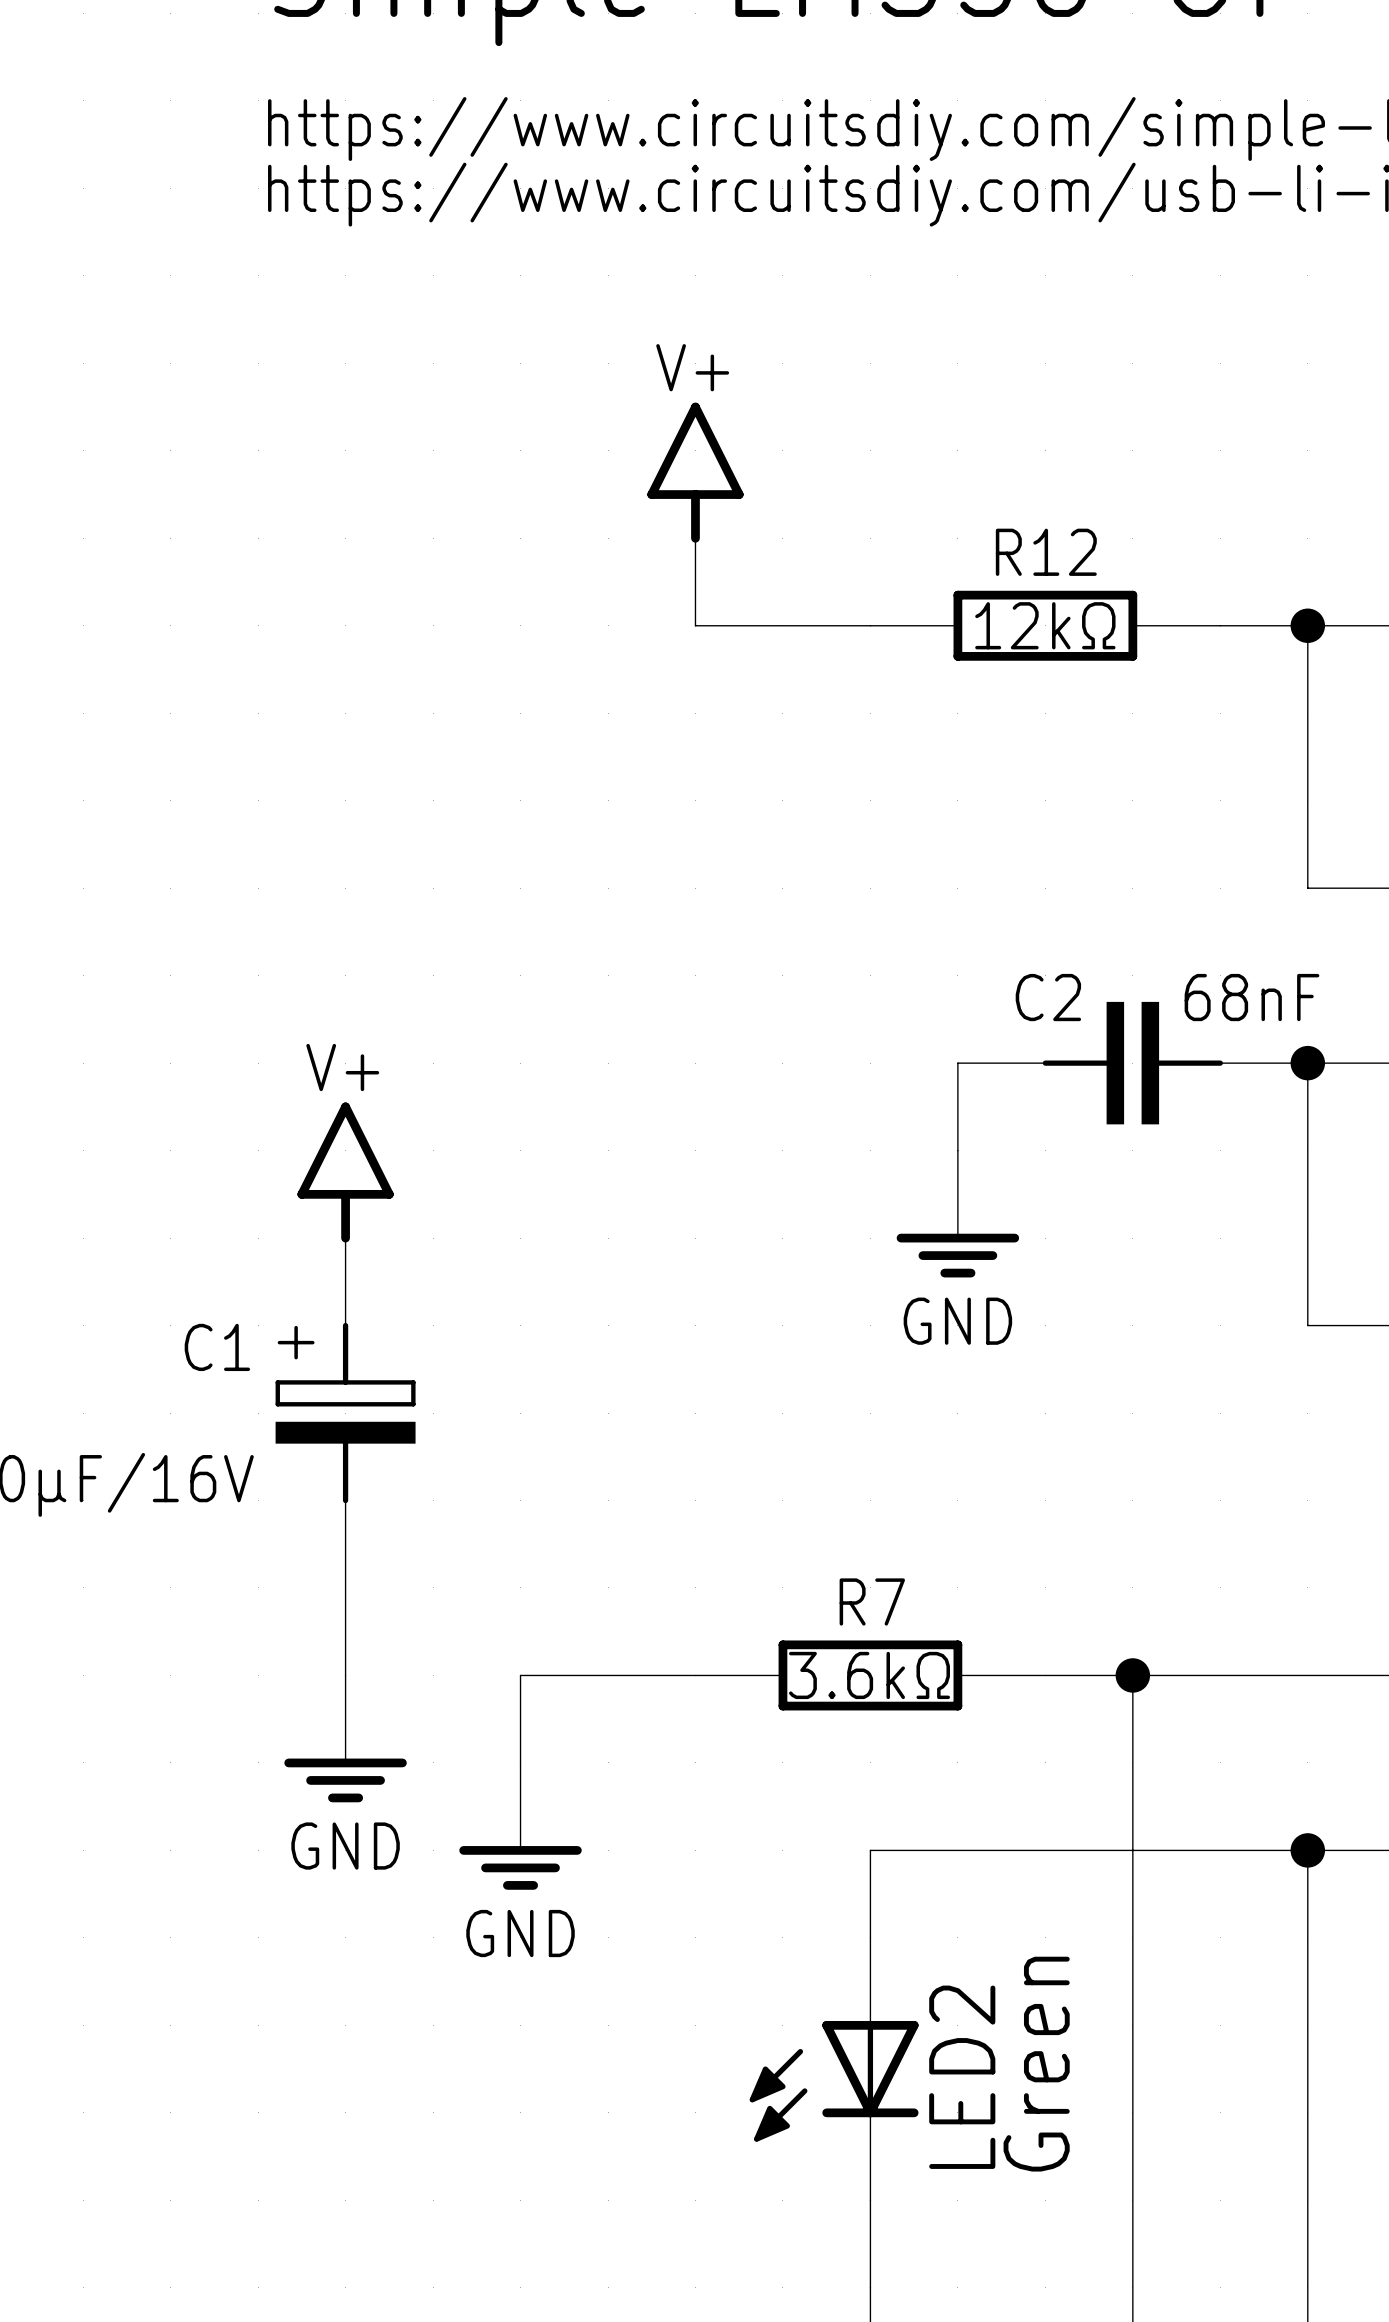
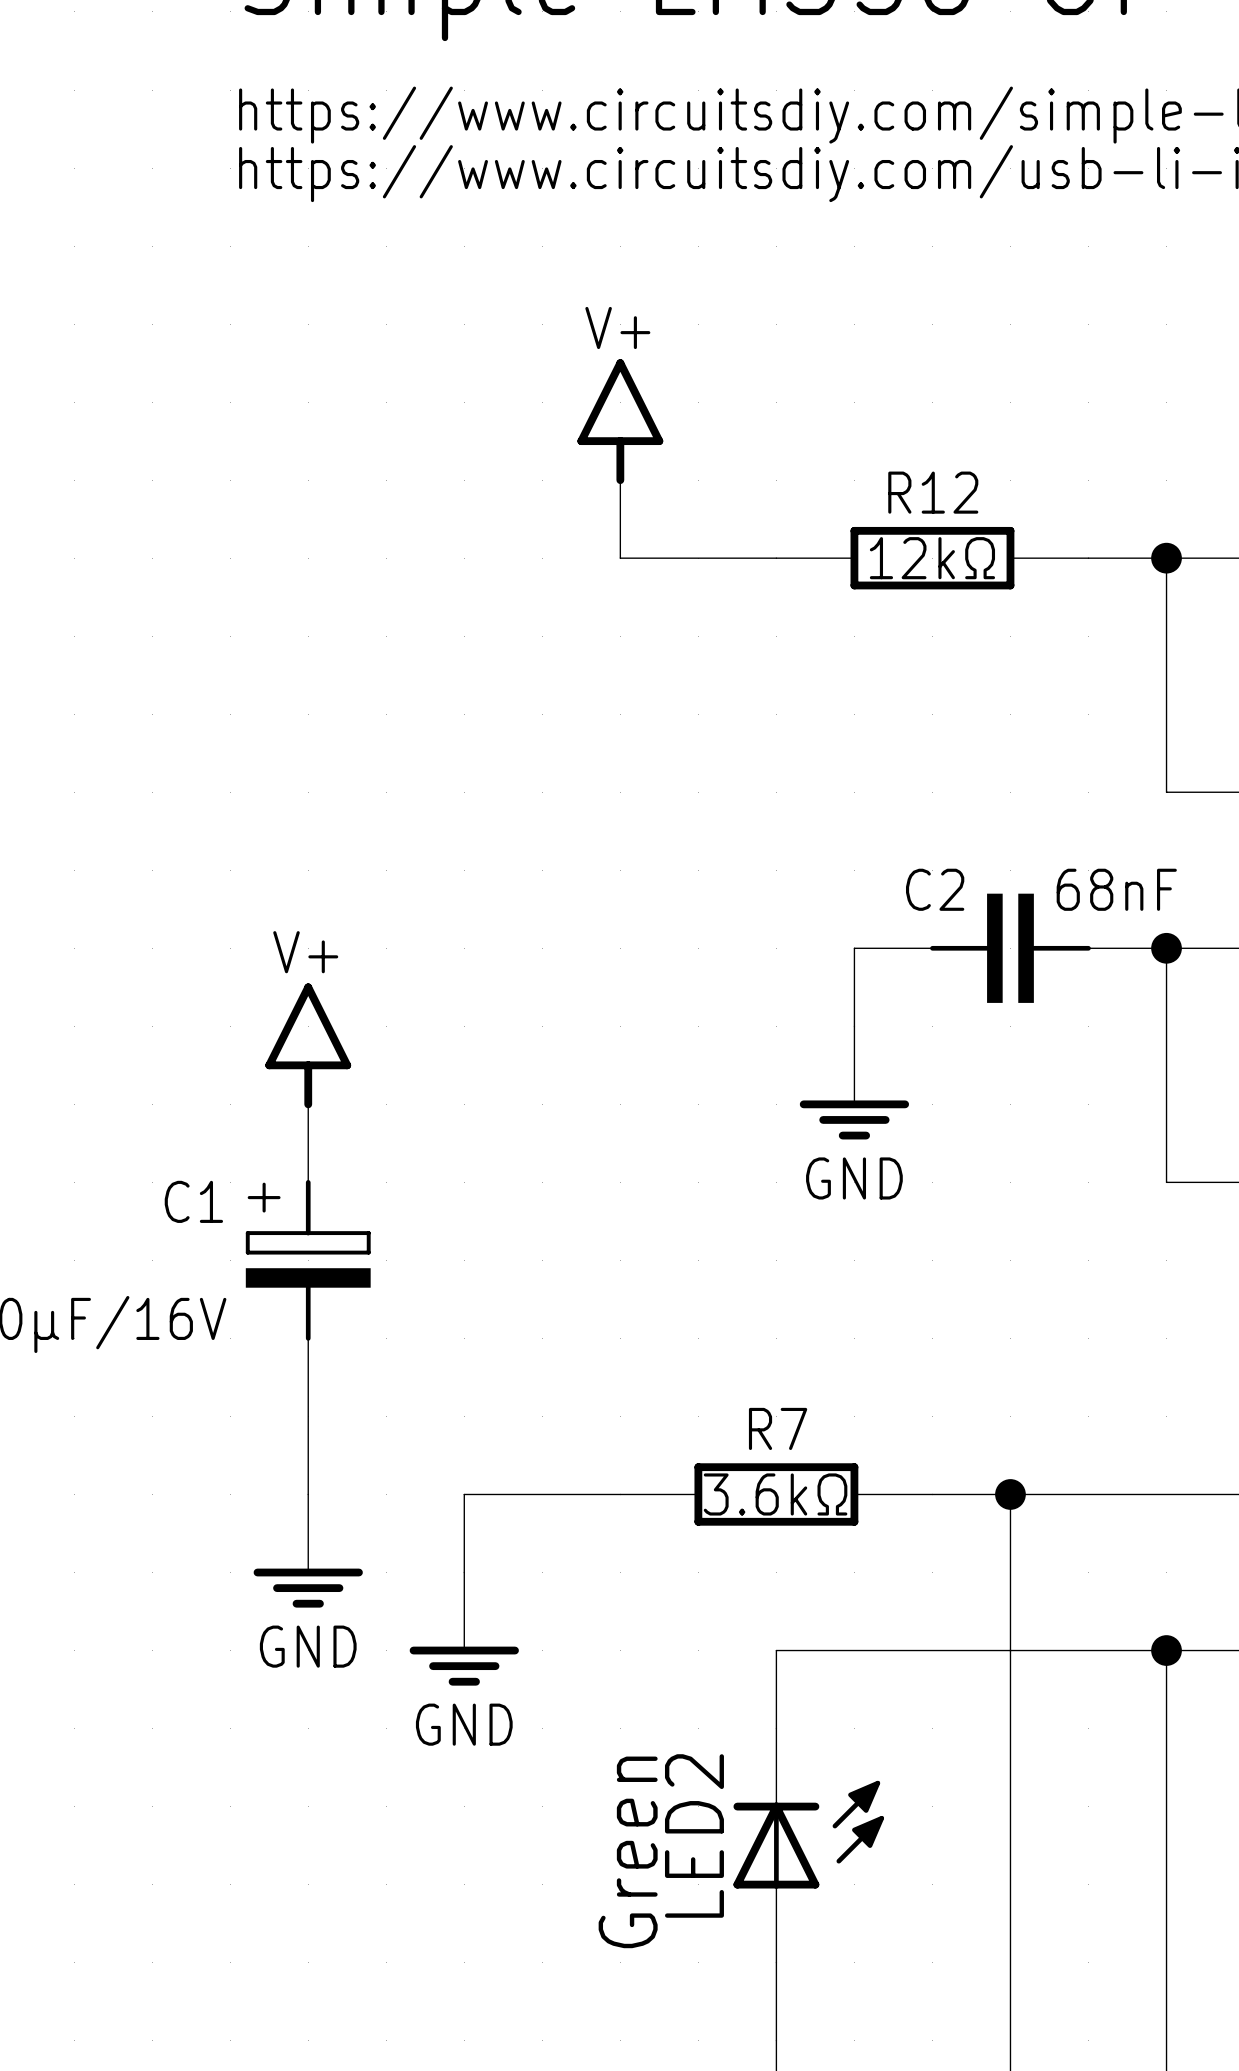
LED2 rotation: 0° (834, 2081) -> 180° (808, 1834)

